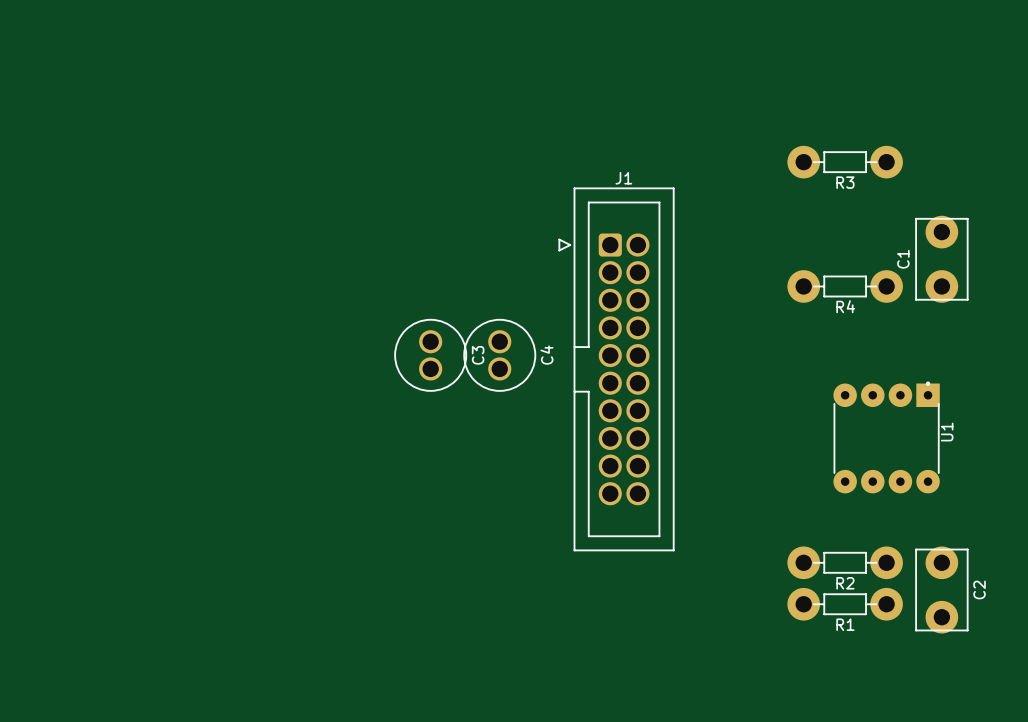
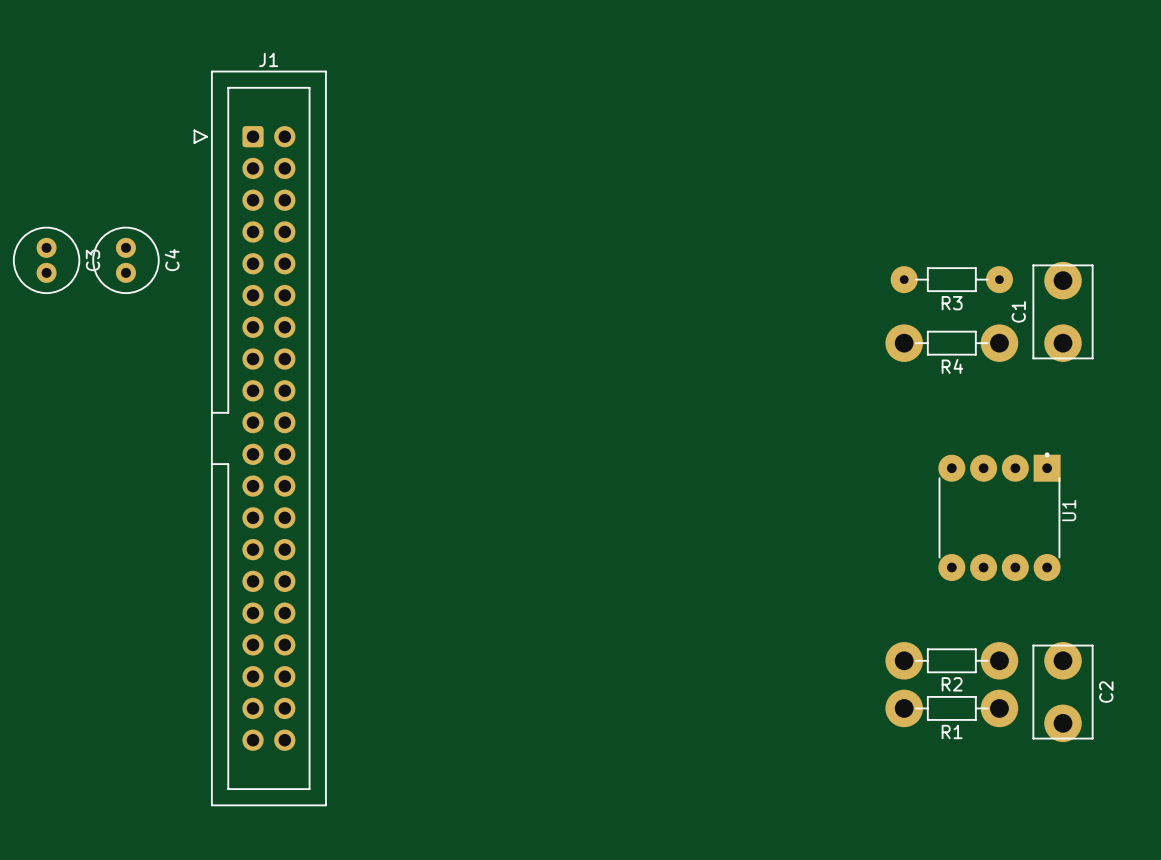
R3 footprint: [787, 145, 903, 179] -> [890, 266, 1013, 294]
J1 name position: J1 (623, 178) -> J1 (268, 59)
J1 footprint: [558, 187, 675, 552] -> [193, 70, 327, 807]
C3 footprint: [394, 319, 467, 392] -> [13, 226, 81, 294]
C4 footprint: [463, 319, 536, 392] -> [92, 226, 160, 294]

